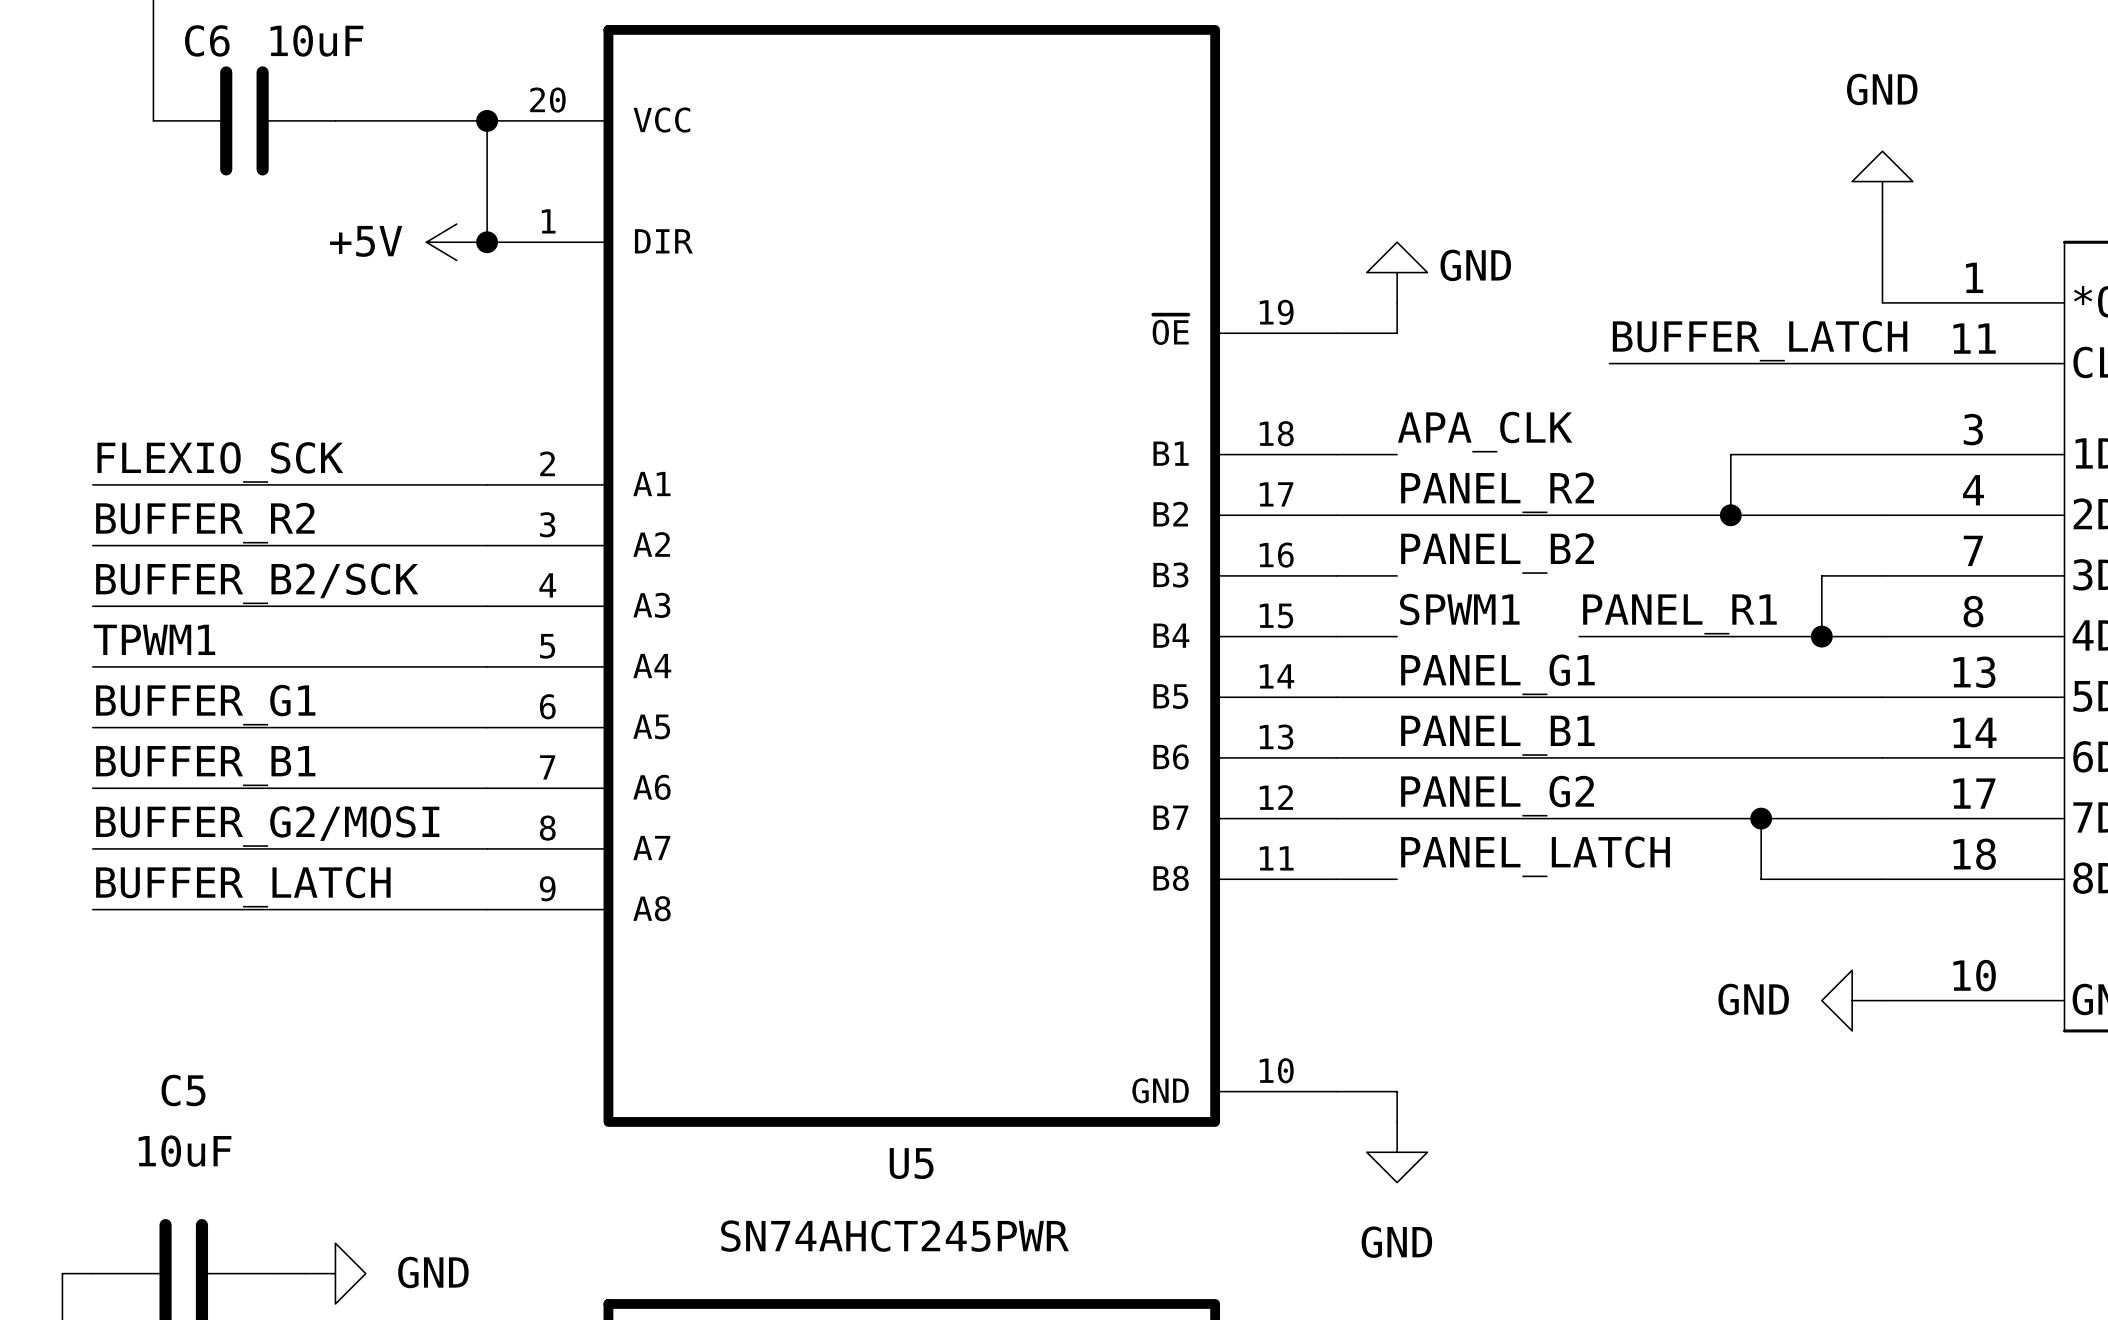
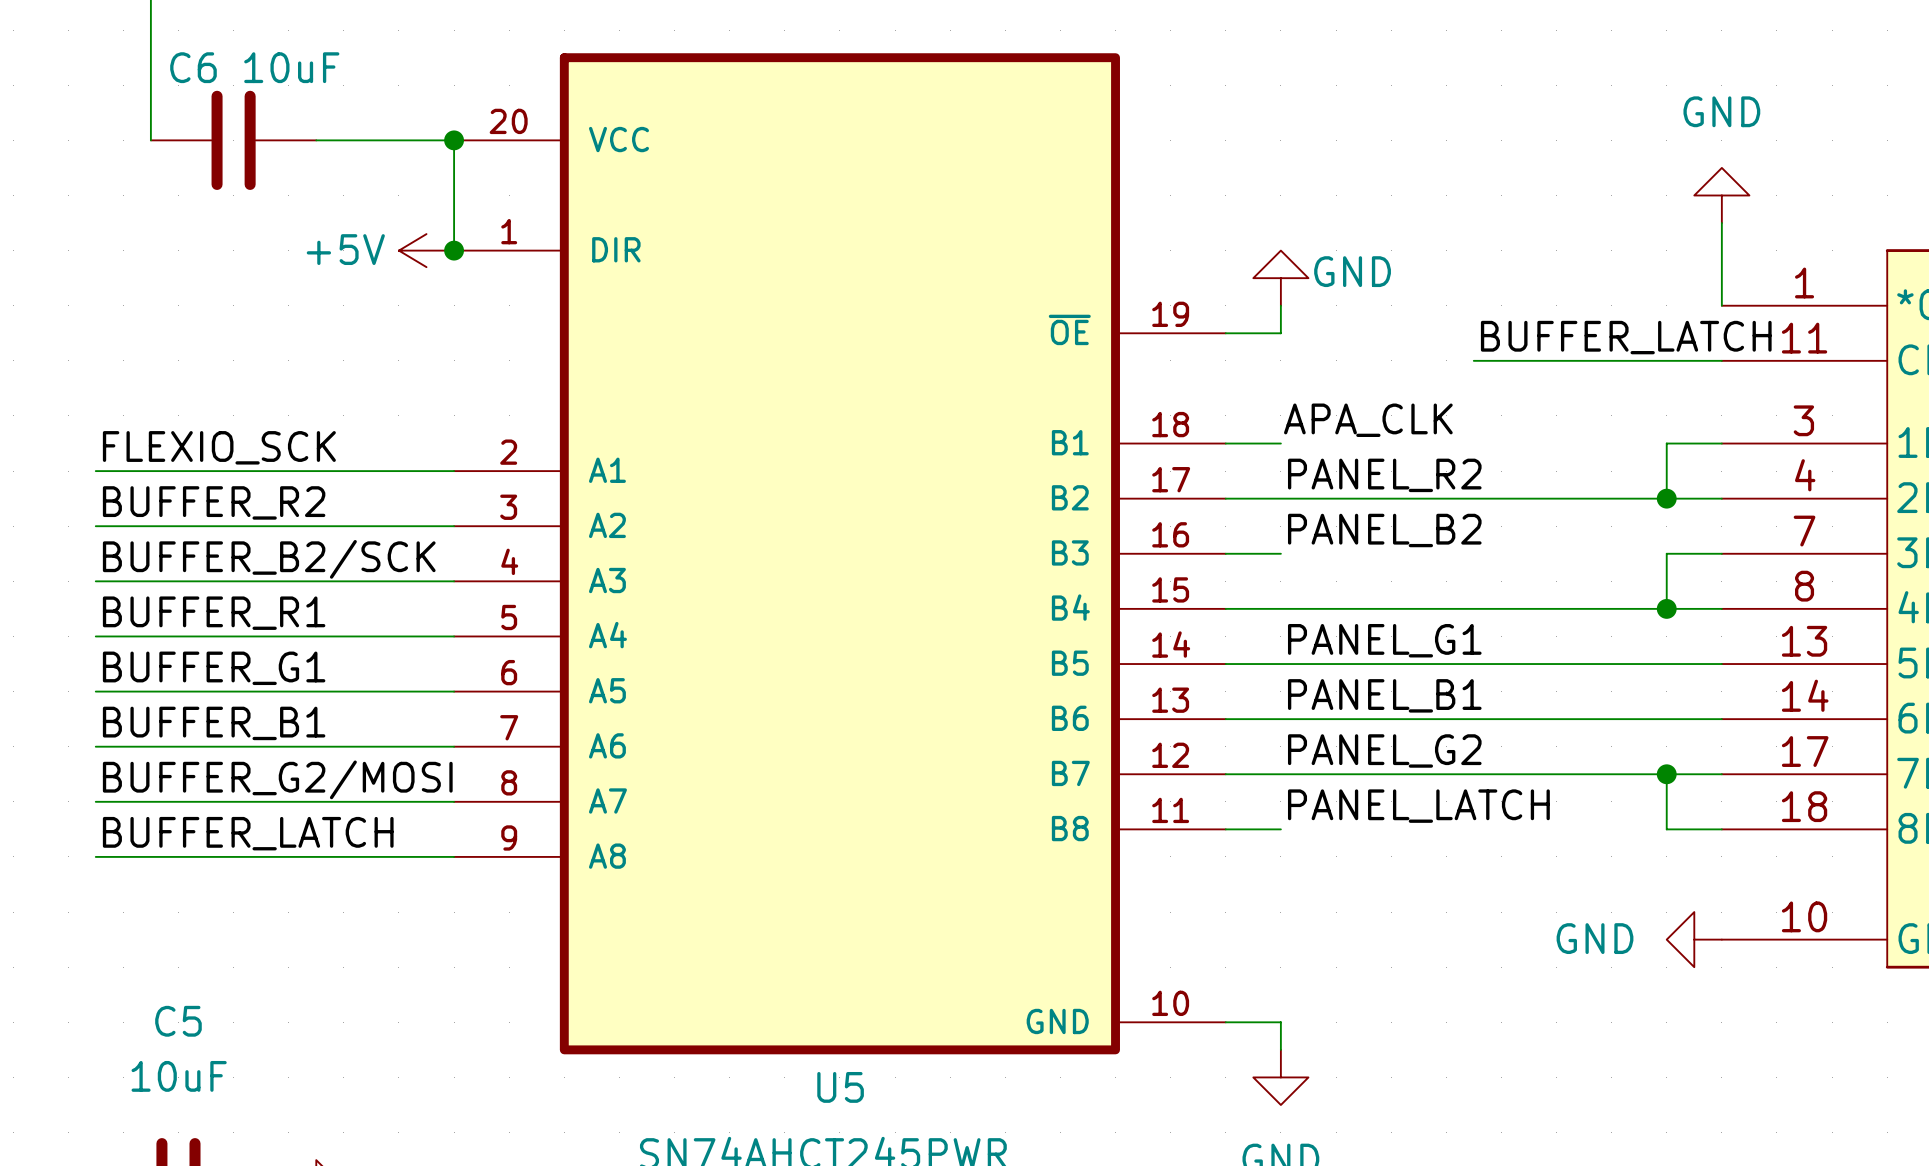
wire: (1821, 454) (1730, 454) (1730, 515) -> (1666, 443) (1666, 498)
junction position: (1730, 515) -> (1666, 498)
label: SPWM1 (1459, 609) -> none
label: PANEL_R1 (1679, 614) -> none
wire: none -> (1280, 608) (1446, 608)
label: TPWM1 (154, 639) -> BUFFER_R1 (214, 613)
wire: (1761, 818) (1761, 879) (1821, 879) -> (1666, 774) (1666, 829)
junction position: (1761, 818) -> (1666, 774)

